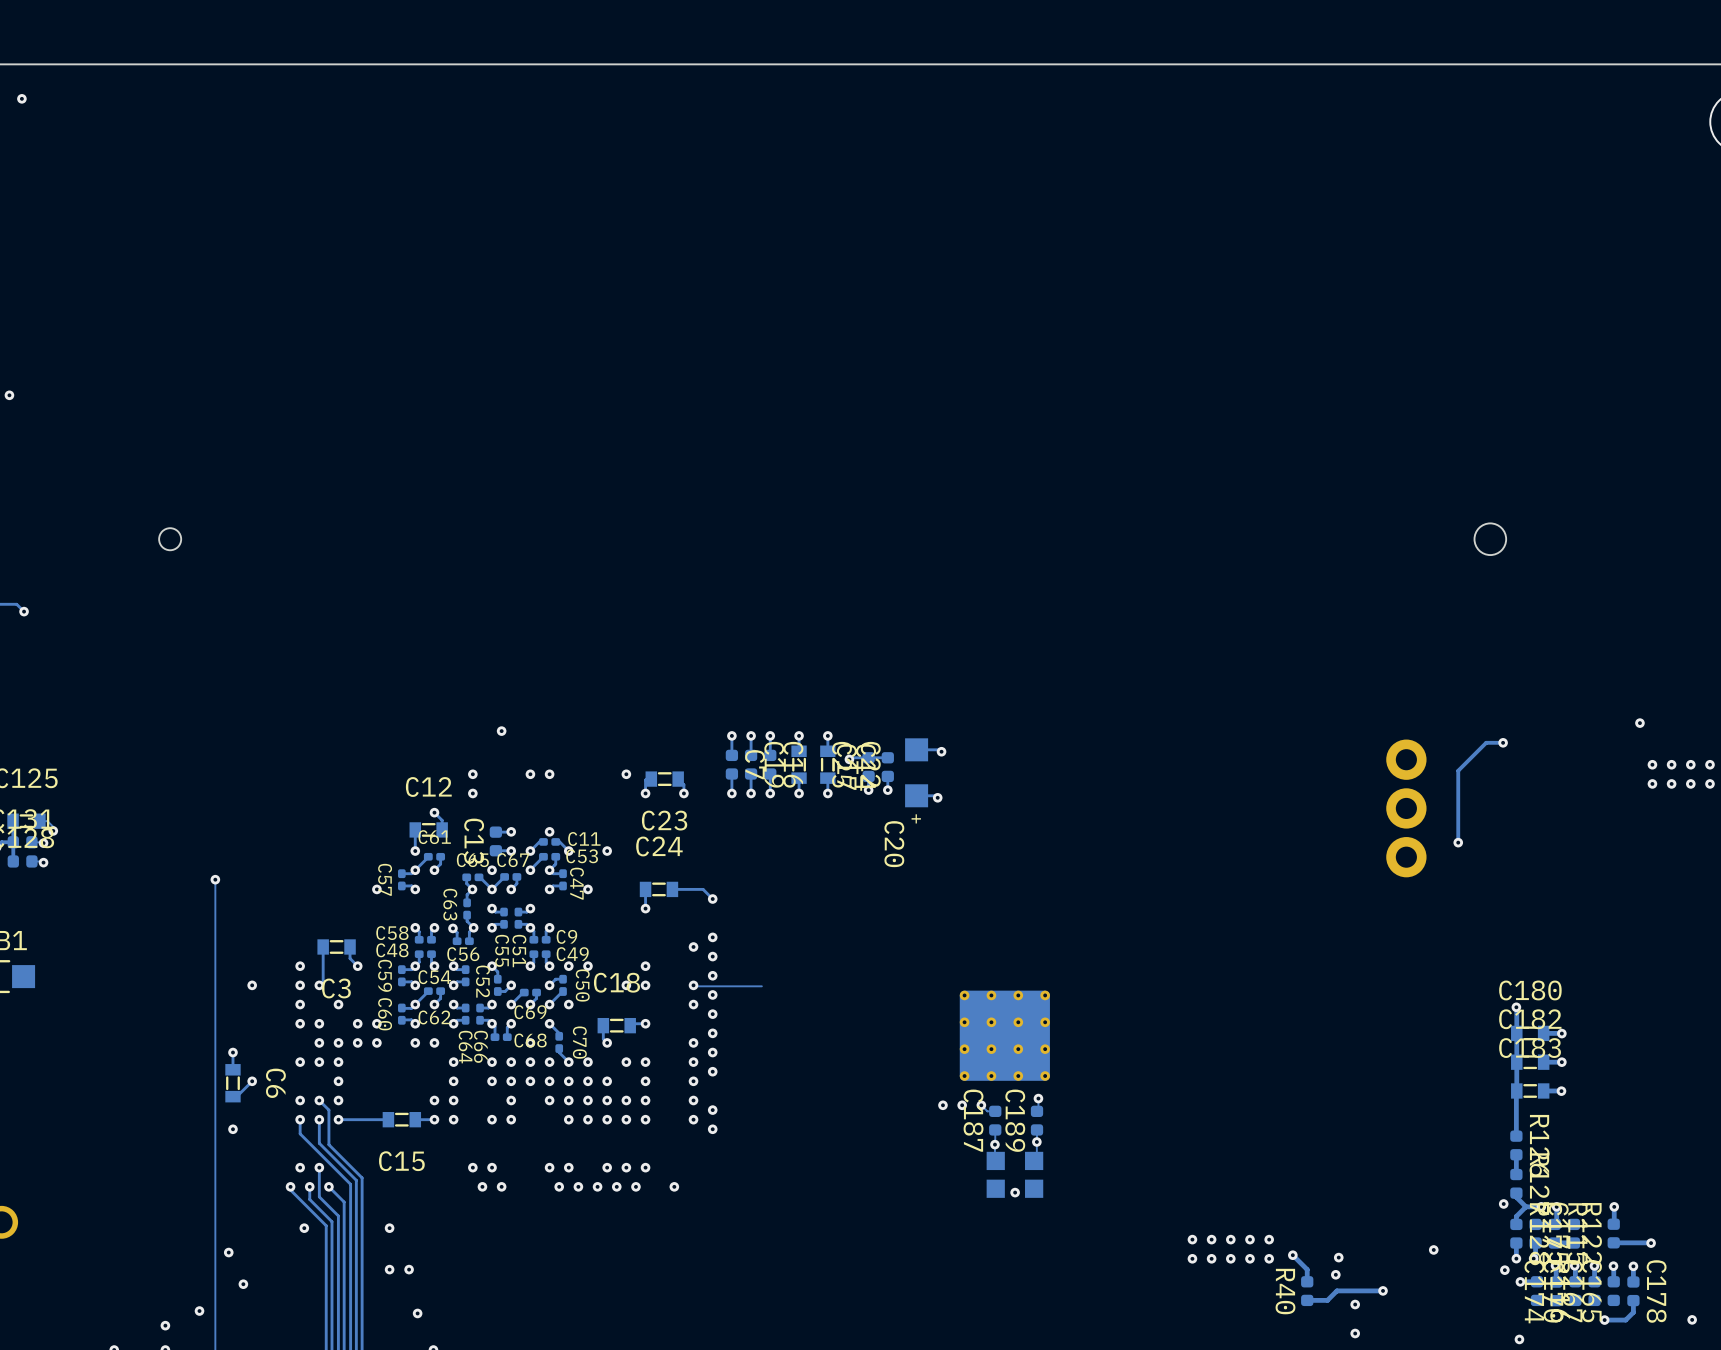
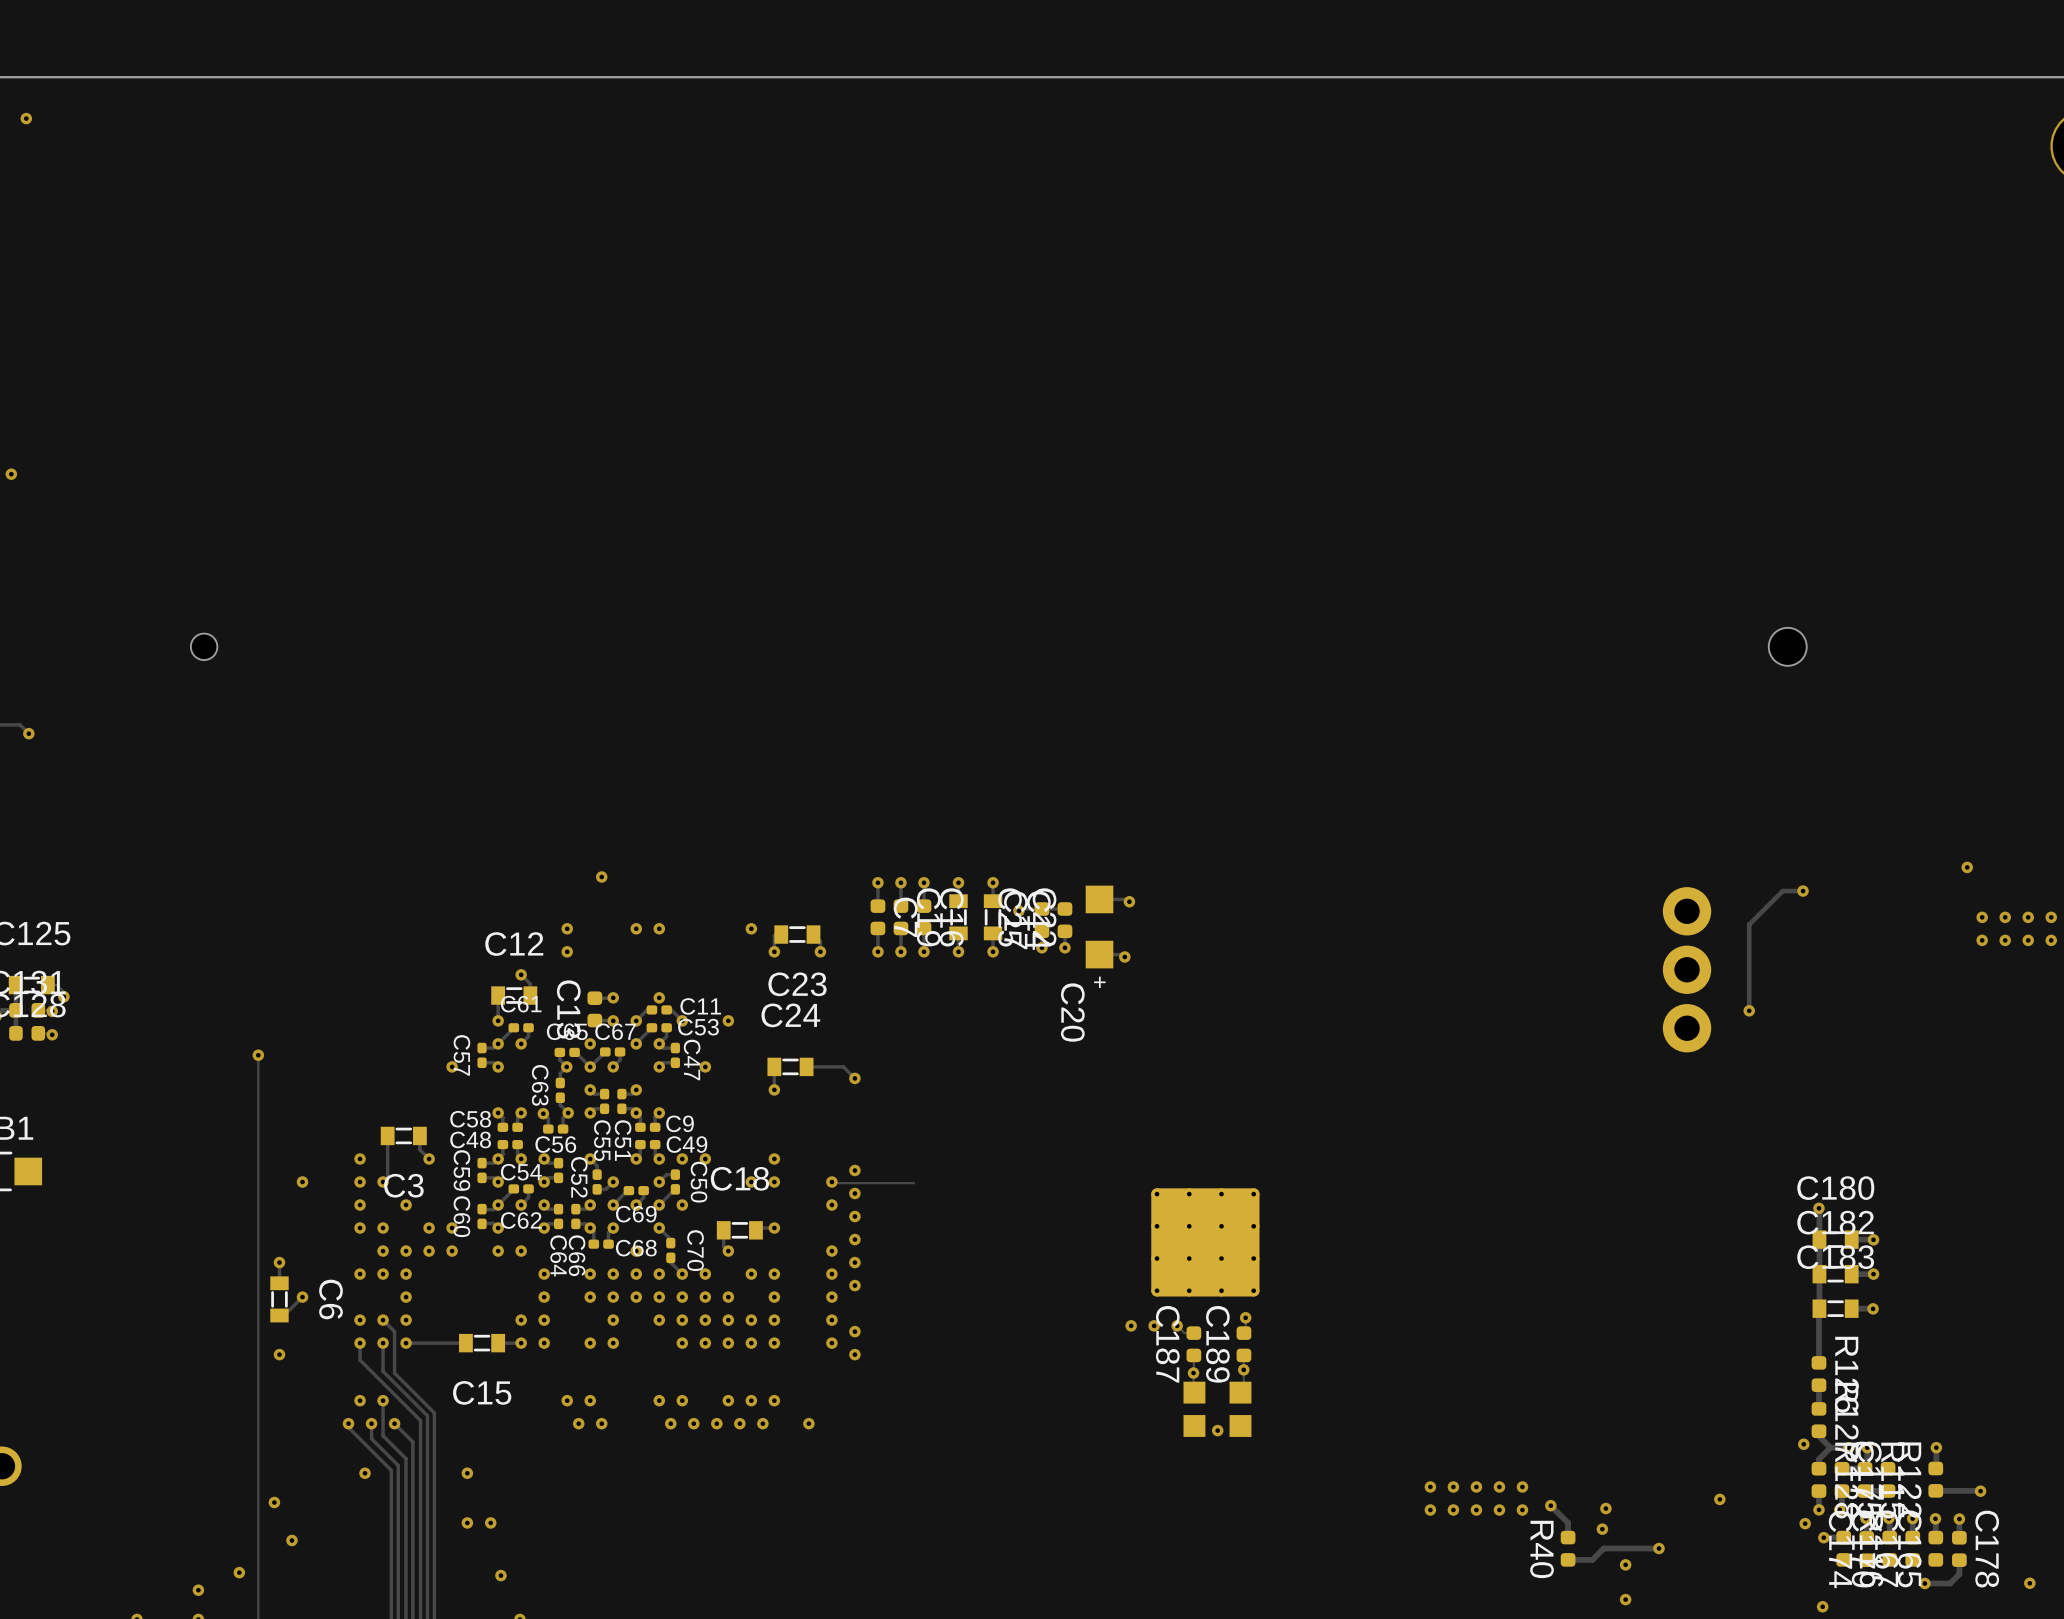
via: (712, 937) -> none
via: (693, 946) -> none
via: (712, 956) -> none

